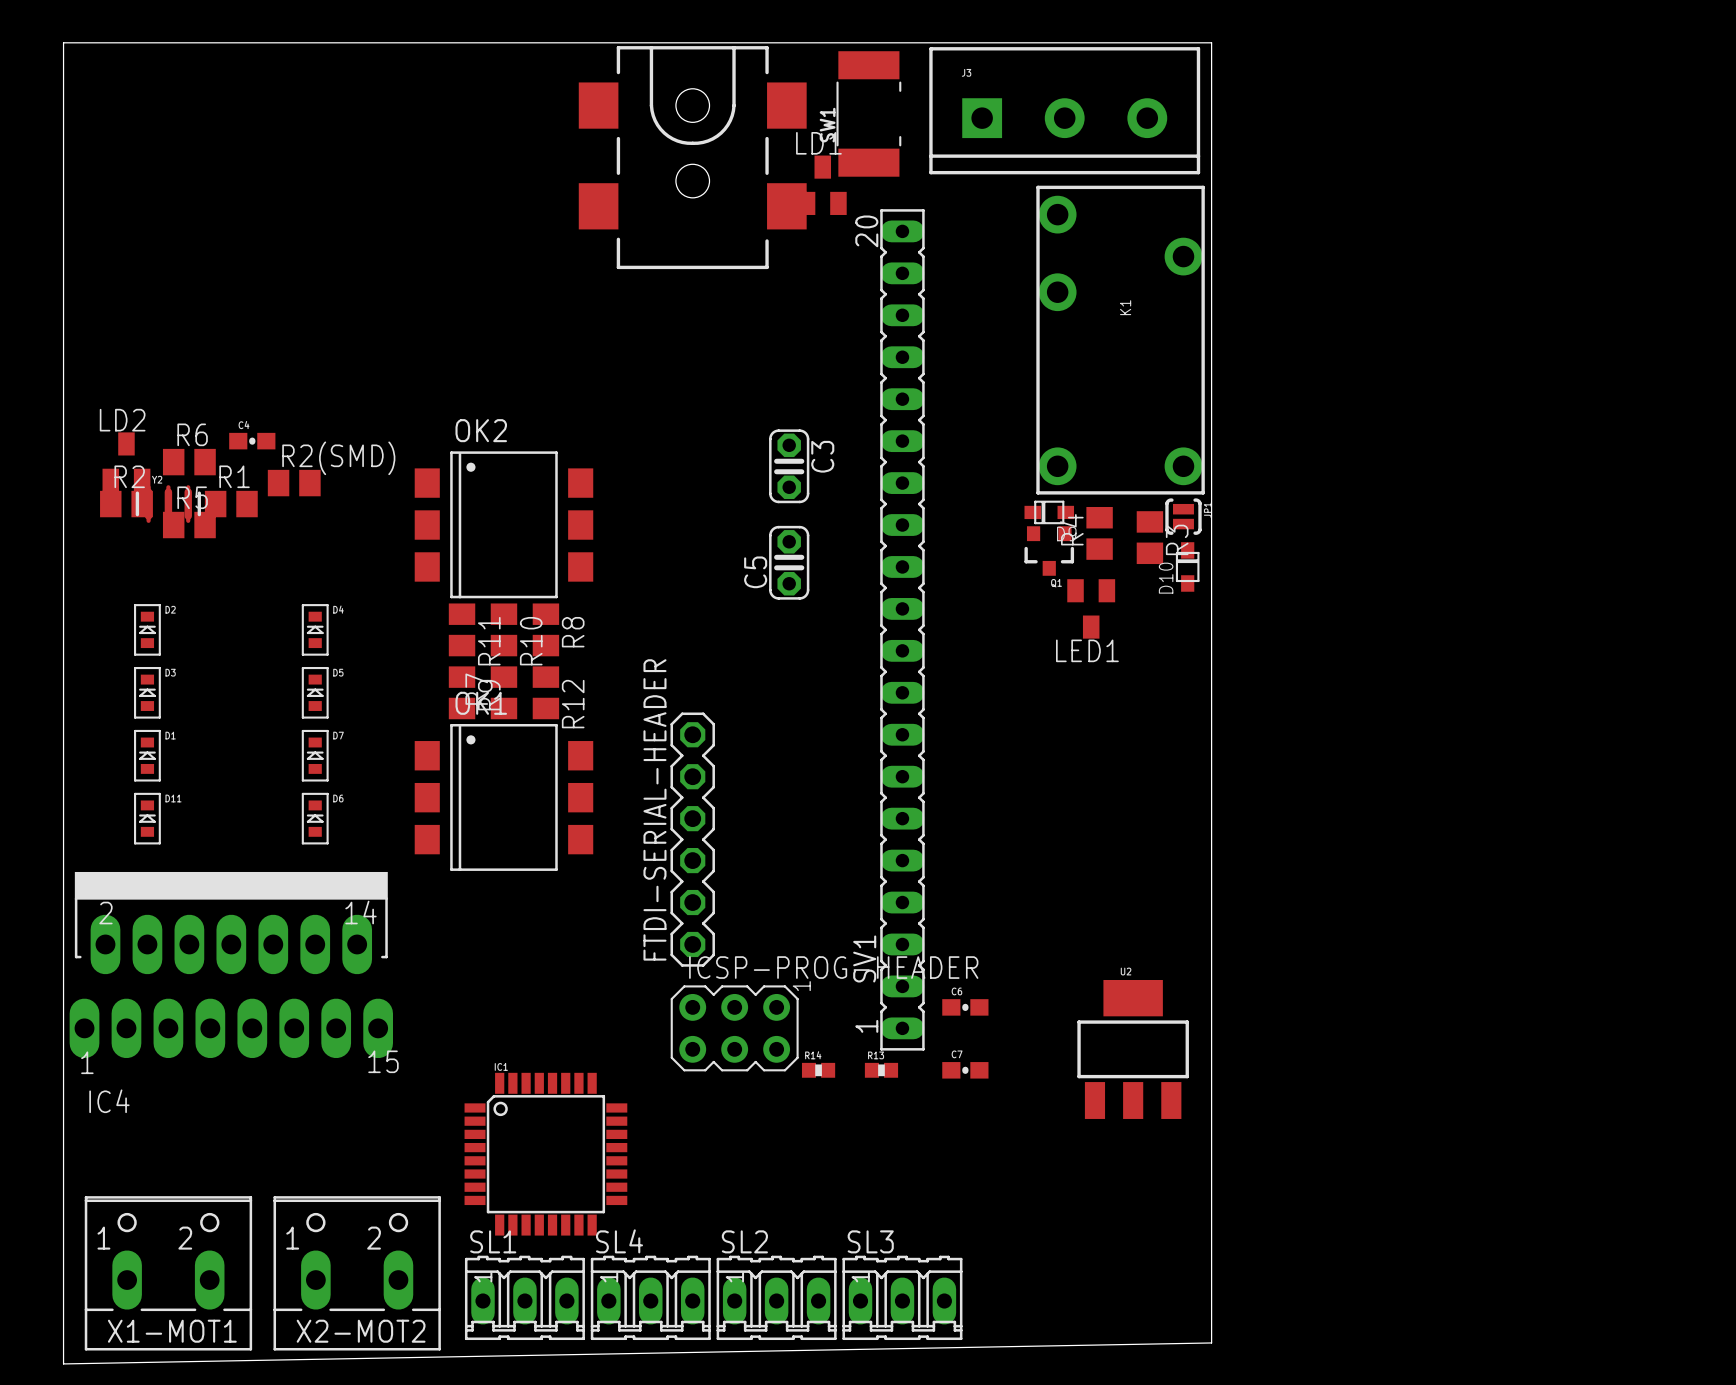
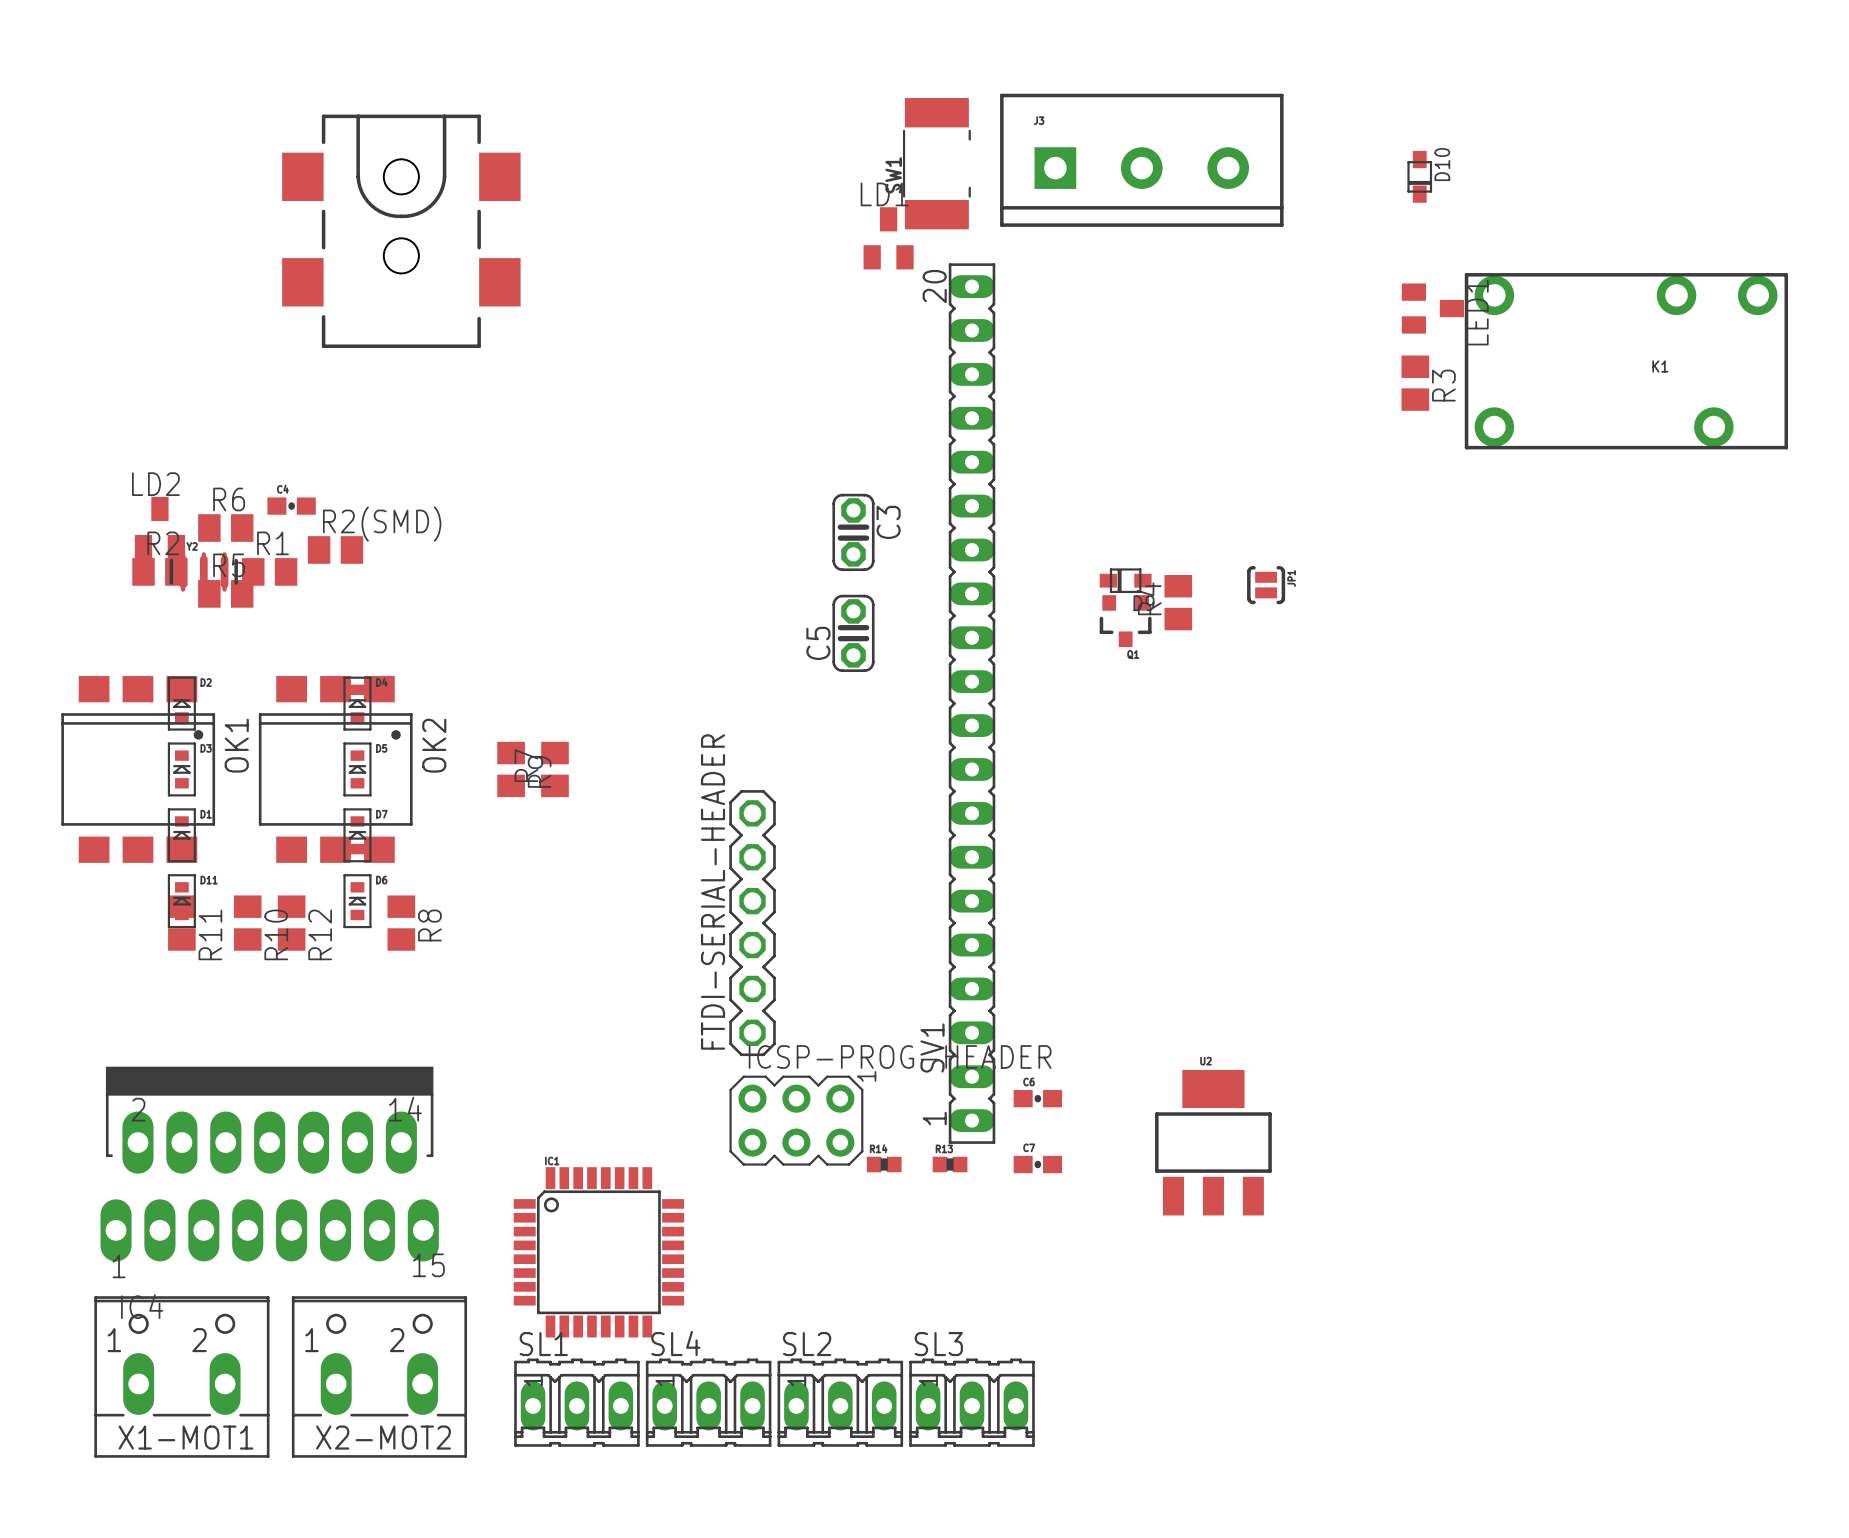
board edge: (63, 42) (1211, 42) (1211, 1342) (63, 1363) (63, 42) -> none
part position: (692, 157) -> (401, 231)
K1 rotation: 0° (1120, 340) -> 90° clockwise (1626, 361)
K1 position: (1120, 340) -> (1626, 361)
OK2 rotation: 0° (503, 524) -> 90° clockwise (335, 769)
OK2 position: (503, 524) -> (335, 769)
R3 position: (1149, 537) -> (1415, 383)
D10 rotation: 0° (1187, 566) -> 180° (1419, 176)
D10 position: (1187, 566) -> (1419, 176)
LED1 rotation: 0° (1091, 608) -> 90° counterclockwise (1432, 308)
LED1 position: (1091, 608) -> (1432, 308)
R11 position: (462, 629) -> (181, 923)
R10 position: (503, 629) -> (247, 923)
R8 position: (545, 629) -> (401, 923)
R12 position: (545, 692) -> (291, 923)
OK1 rotation: 0° (503, 797) -> 90° clockwise (138, 769)
OK1 position: (503, 797) -> (138, 769)
IC4 position: (231, 965) -> (269, 1164)
X1-MOT1 position: (168, 1273) -> (181, 1376)
X2-MOT2 position: (357, 1273) -> (379, 1376)

